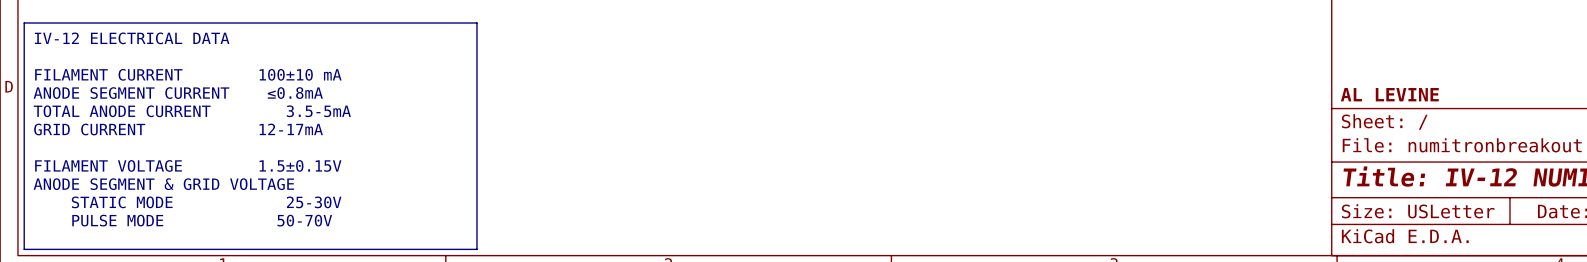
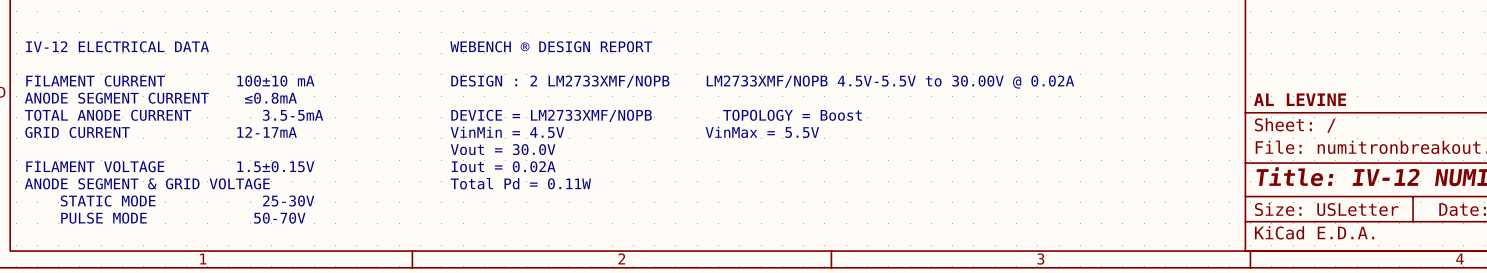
line: (24, 23) (476, 23) (476, 249) (24, 249) (24, 23) -> none
text: none -> WEBENCH ® DESIGN REPORT (551, 46)
text: none -> DESIGN : 2 LM2733XMF/NOPB LM2733XMF/NOPB 4.5V-5.5V to 30.00V @ 0.02A (762, 82)
text: none -> DEVICE = LM2733XMF/NOPB TOPOLOGY = Boost (656, 115)
text: none -> VinMin = 4.5V VinMax = 5.5V (634, 132)
text: none -> Vout = 30.0V (503, 149)
text: none -> Iout = 0.02A (503, 166)
text: none -> Total Pd = 0.11W (520, 183)

